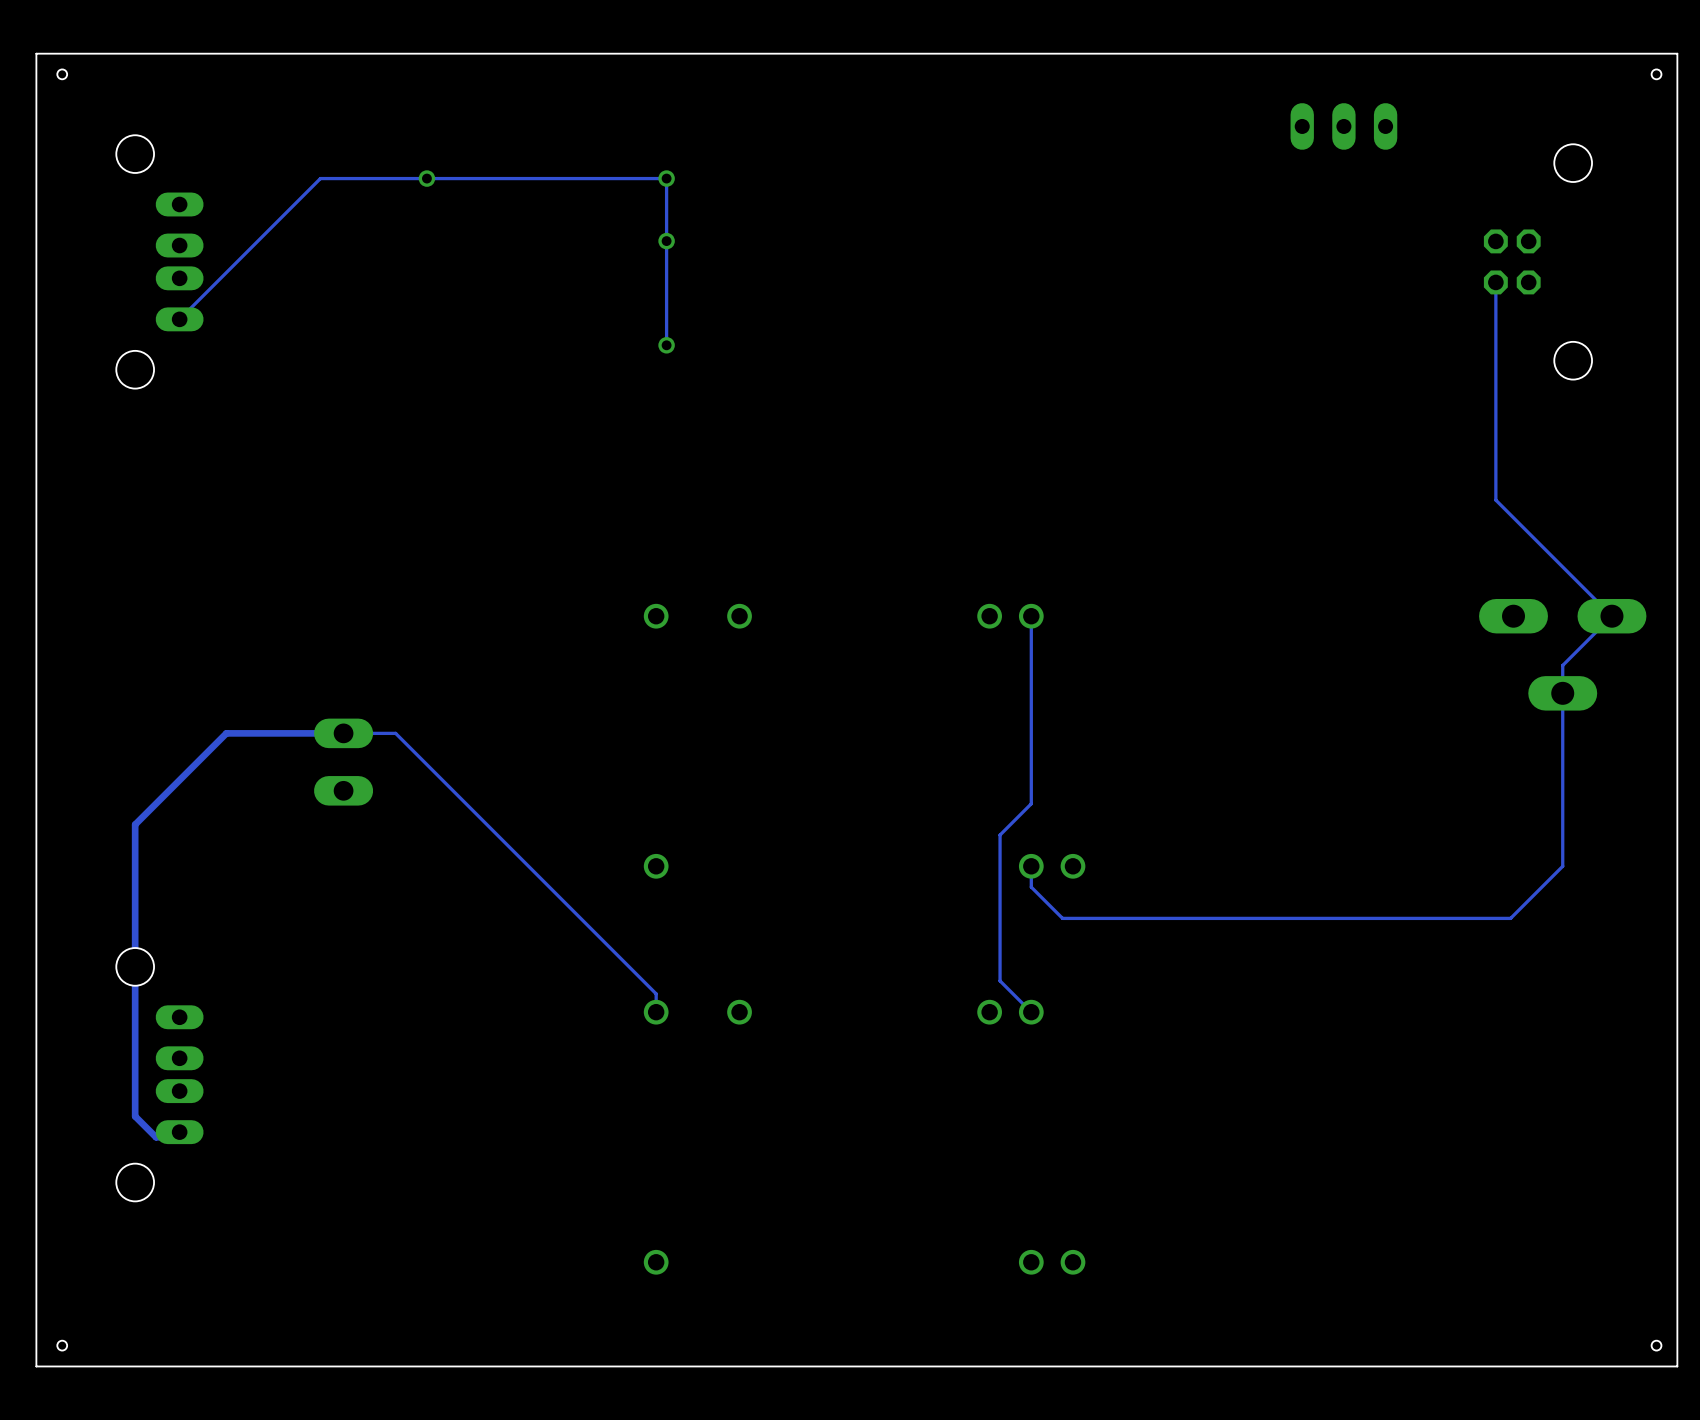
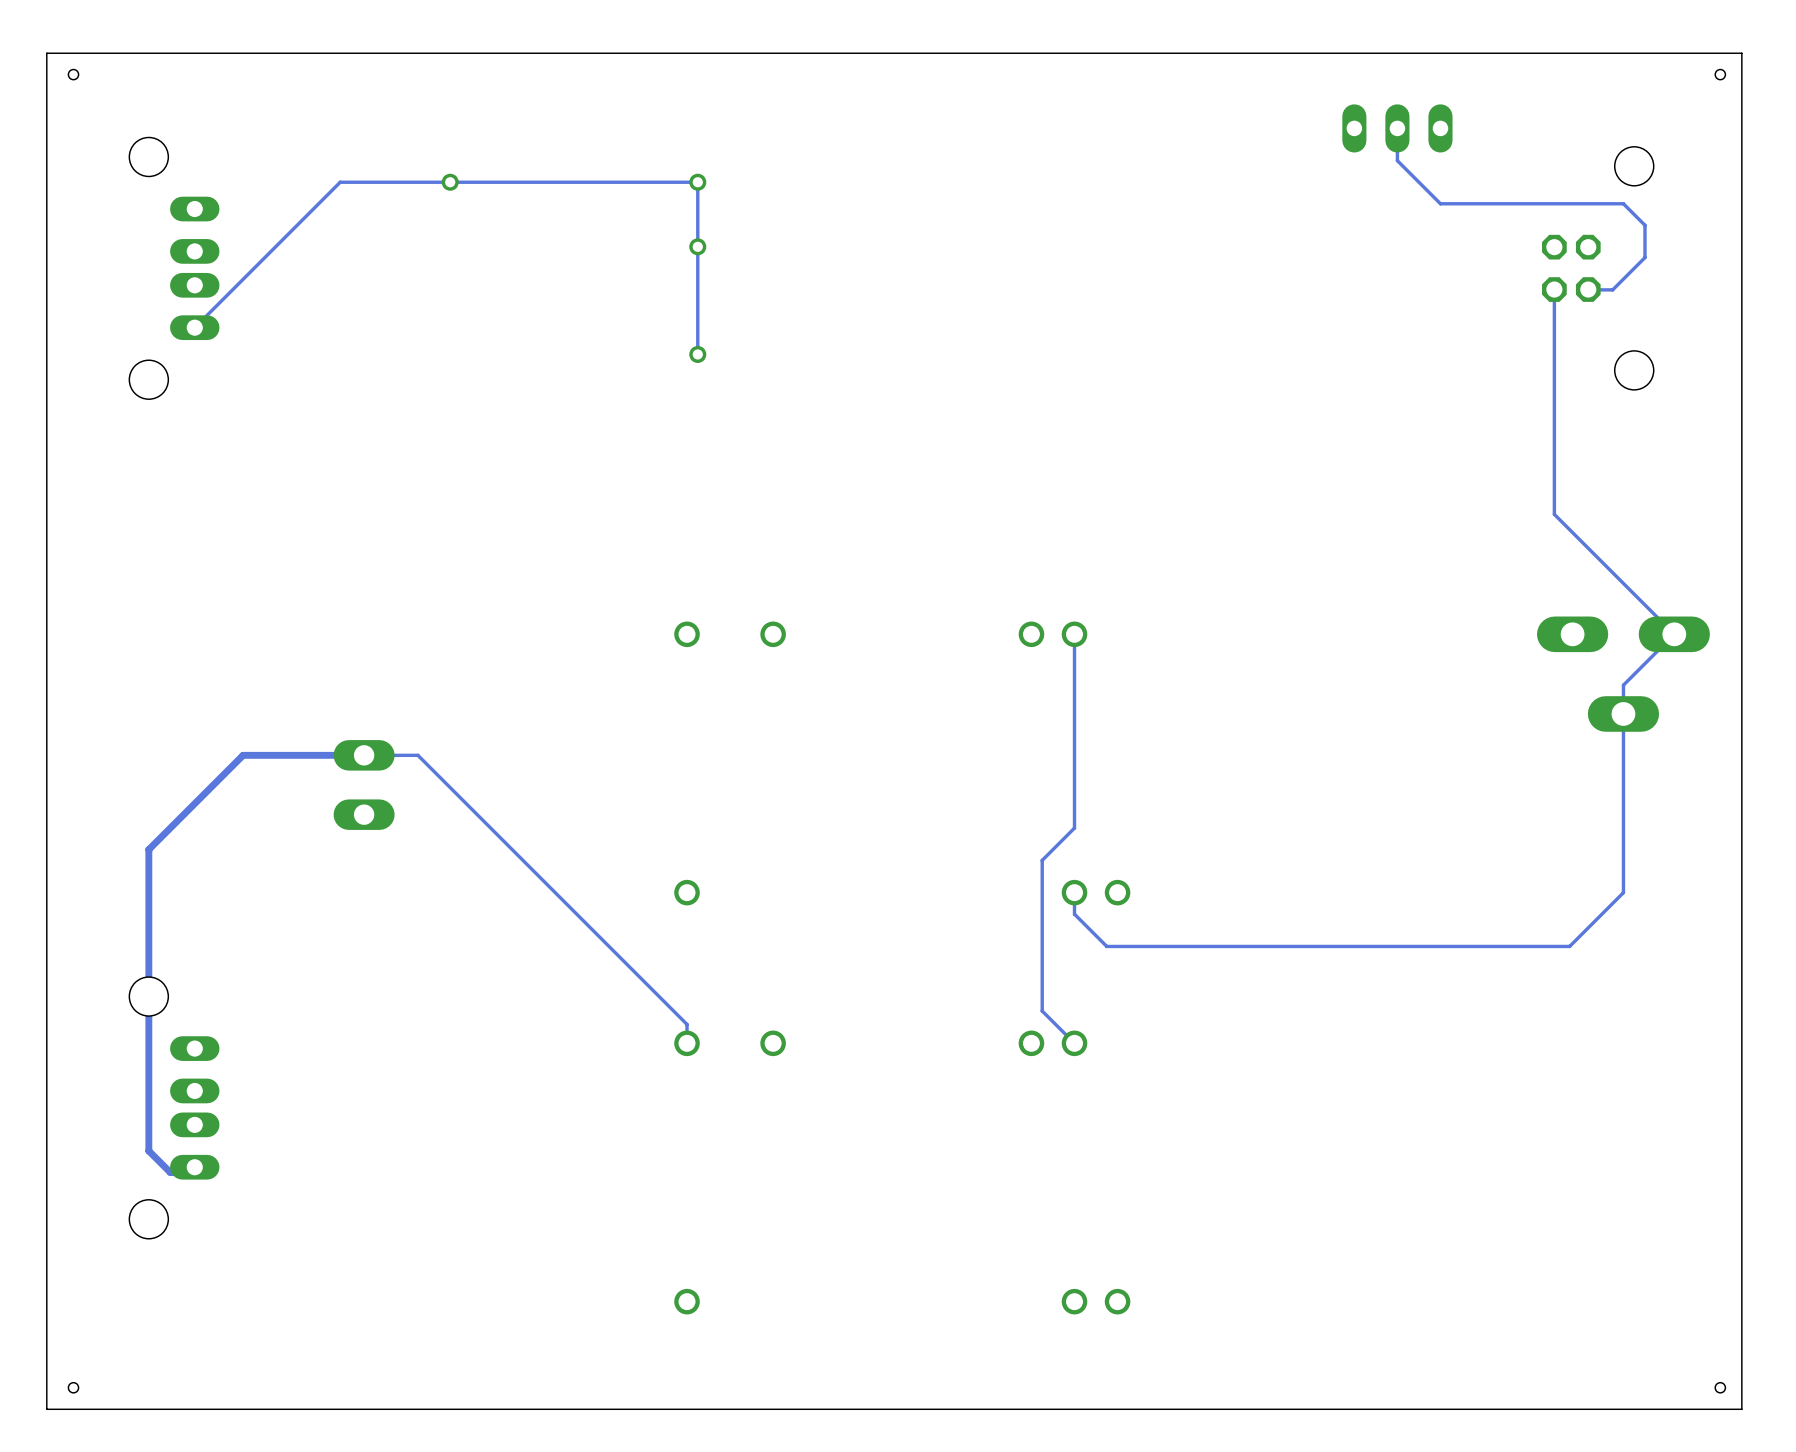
track: none -> (1397, 128) (1397, 160) (1440, 203) (1623, 203) (1644, 225) (1644, 257) (1612, 289) (1588, 289)

